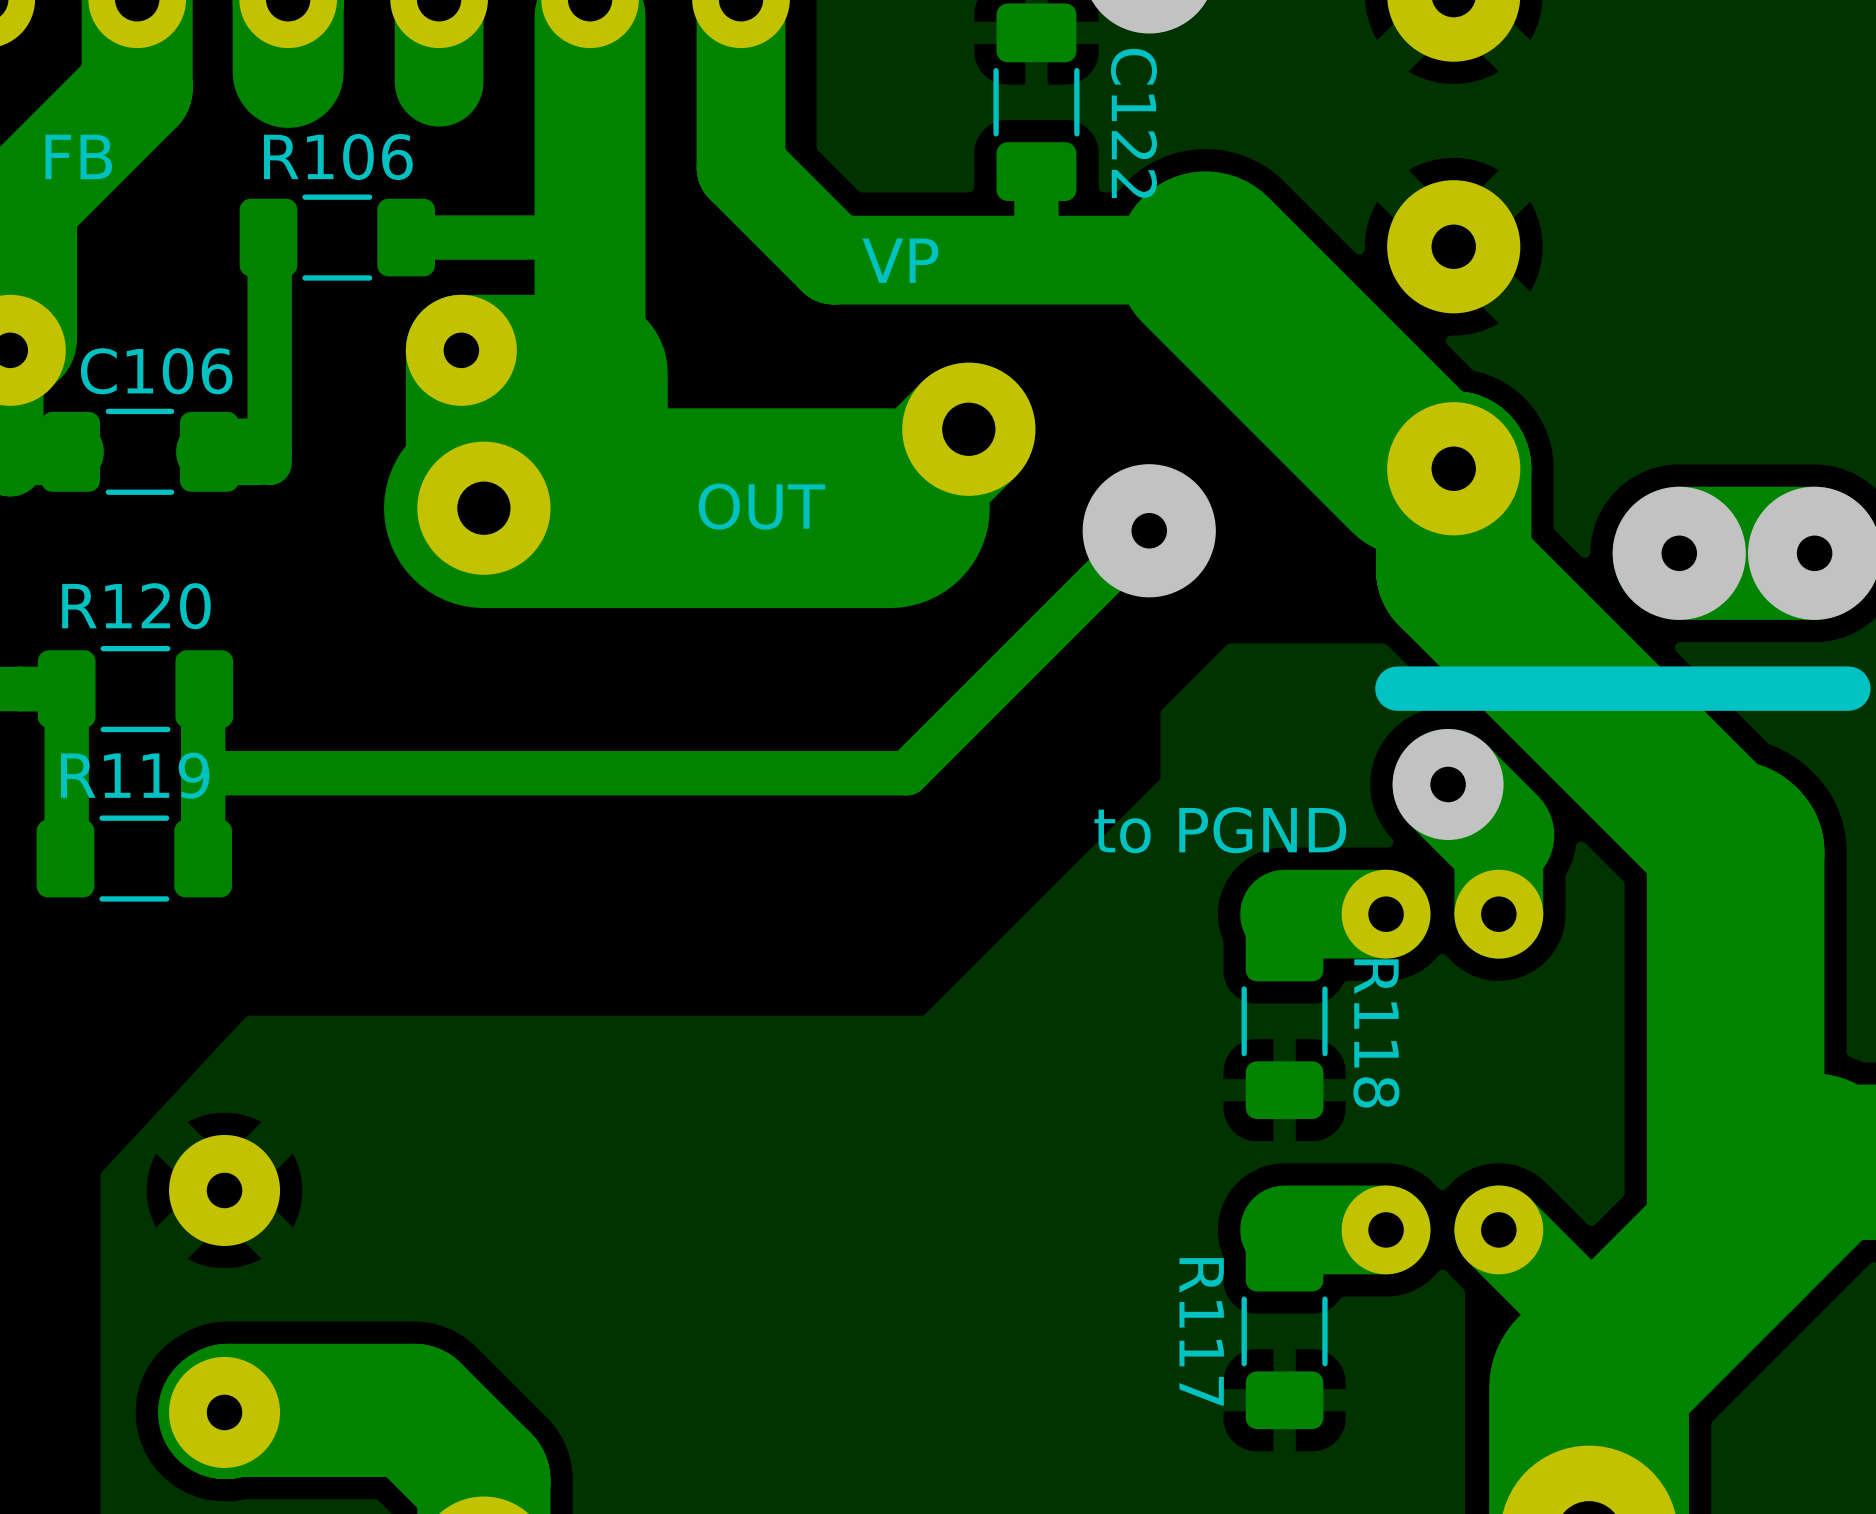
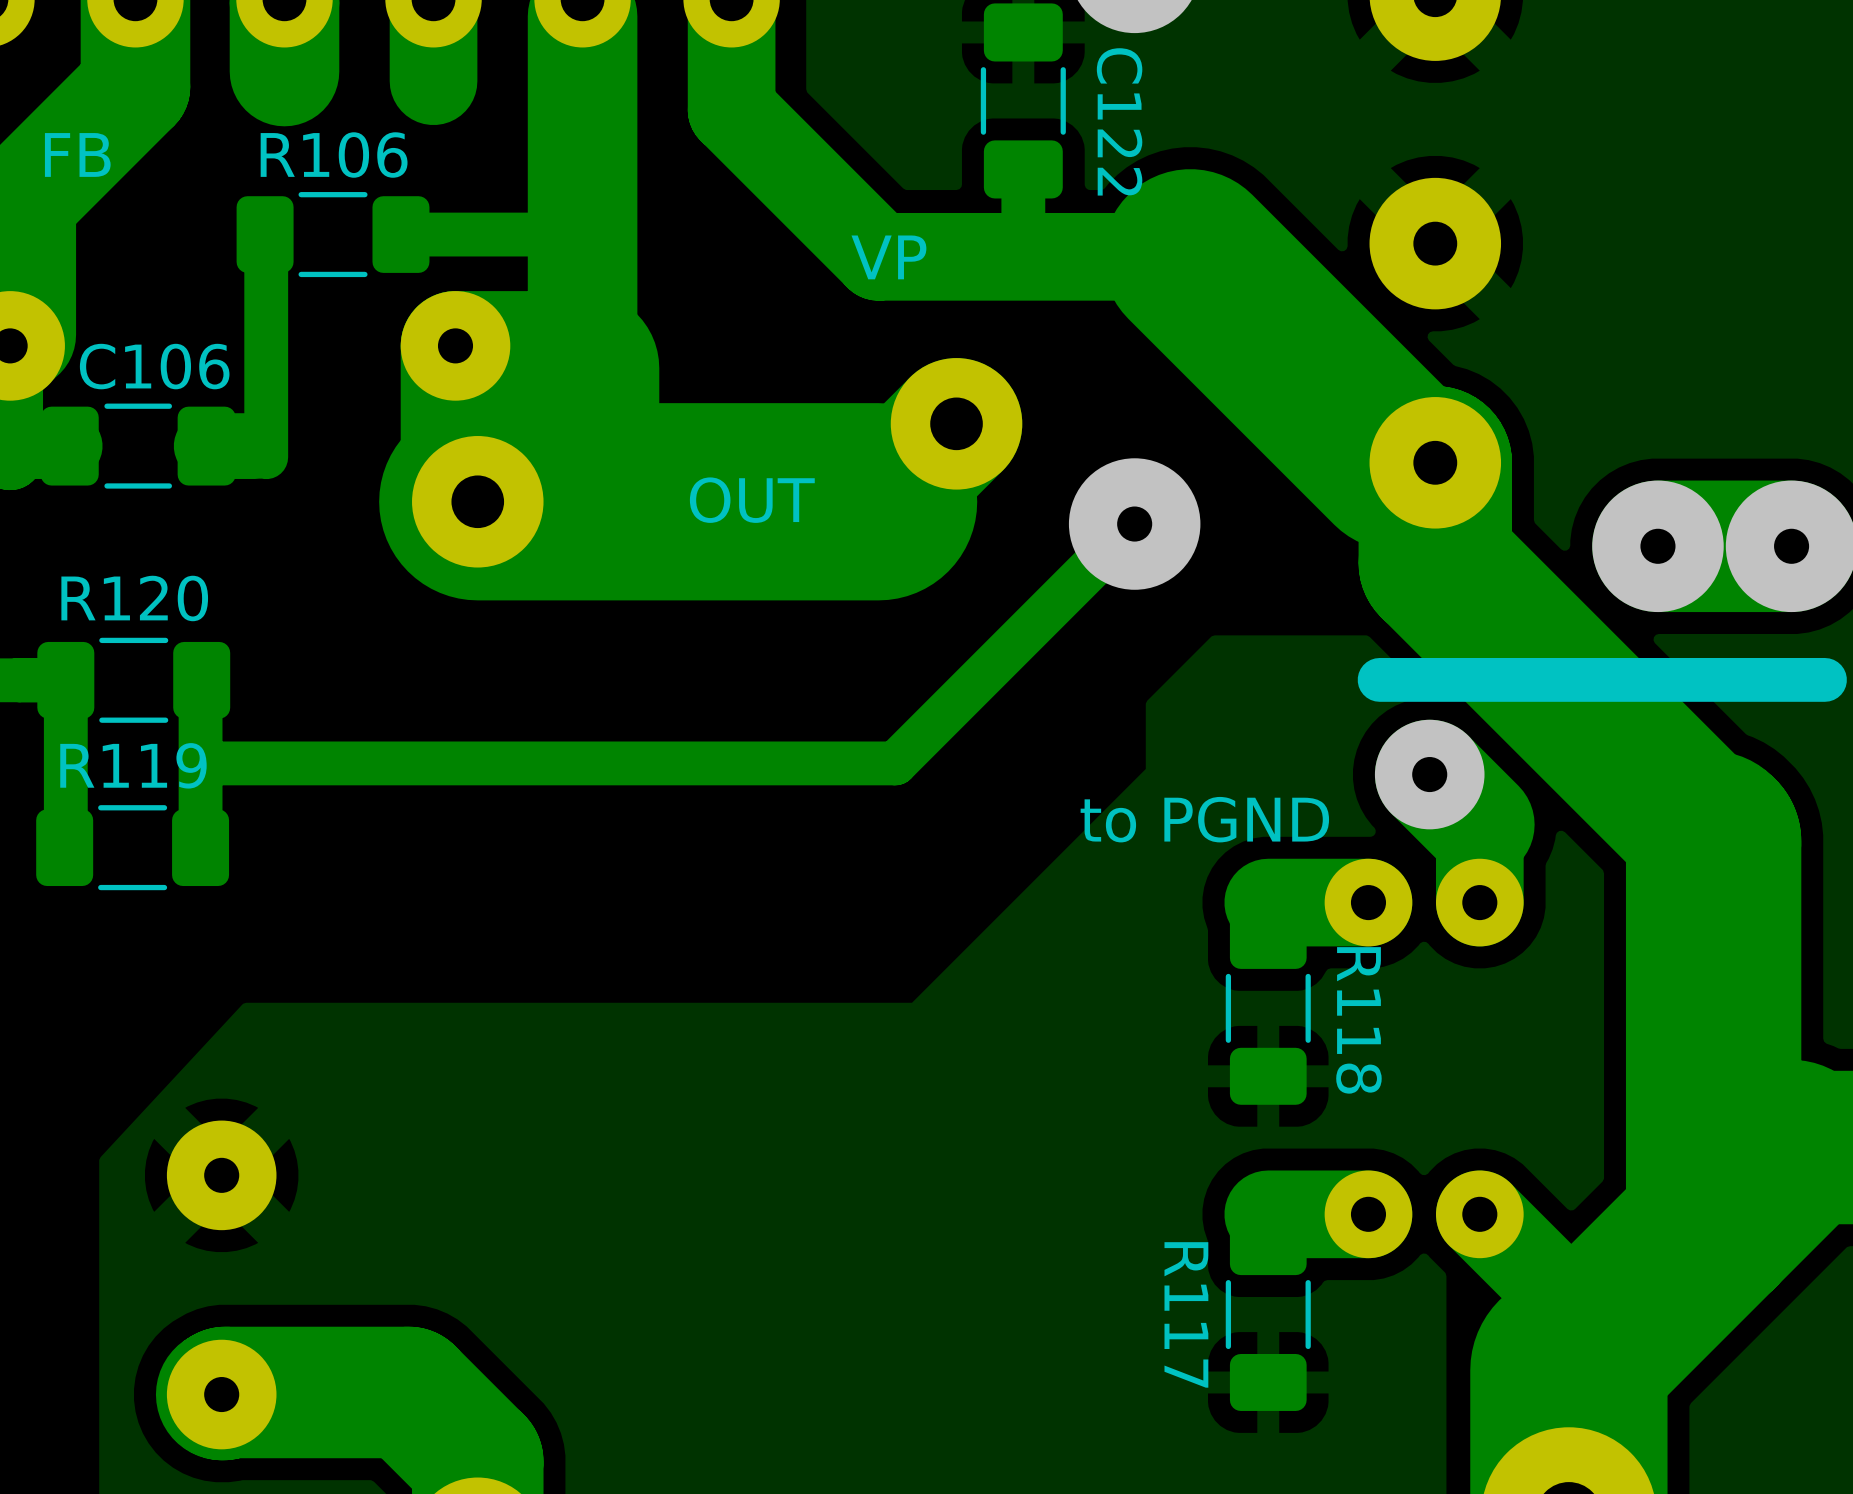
track: (741, 111) (741, 167) (833, 260) (889, 260) -> (731, 109) (878, 256)

